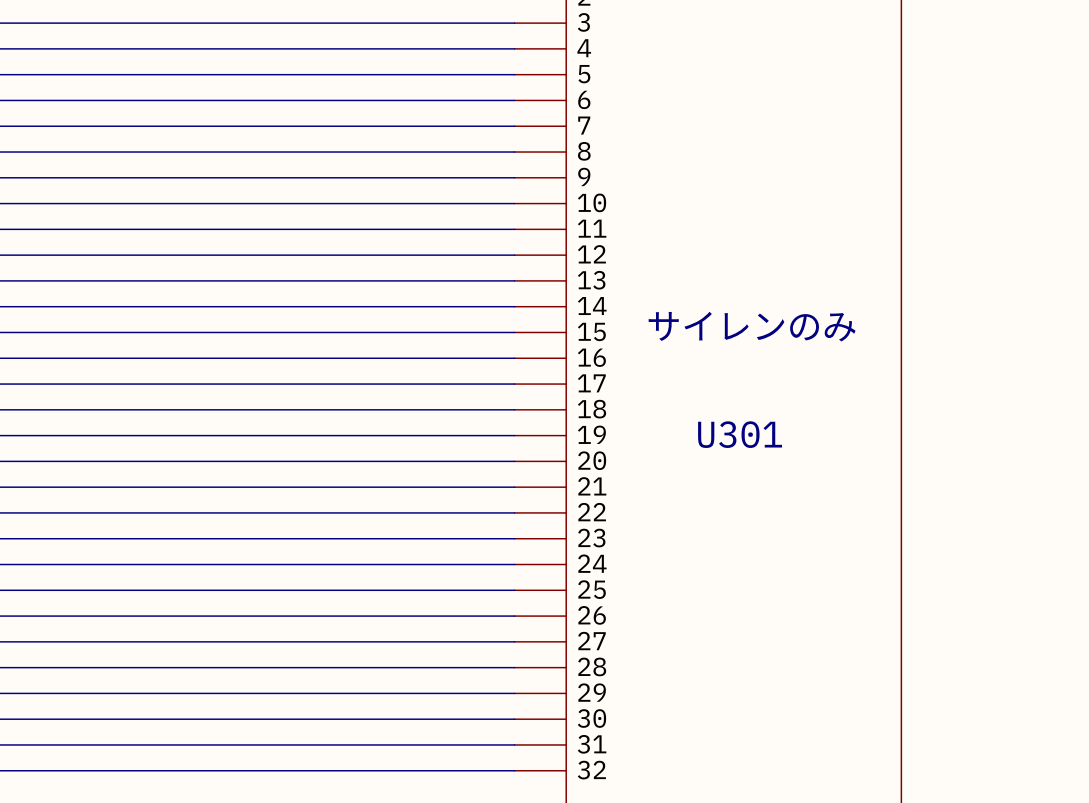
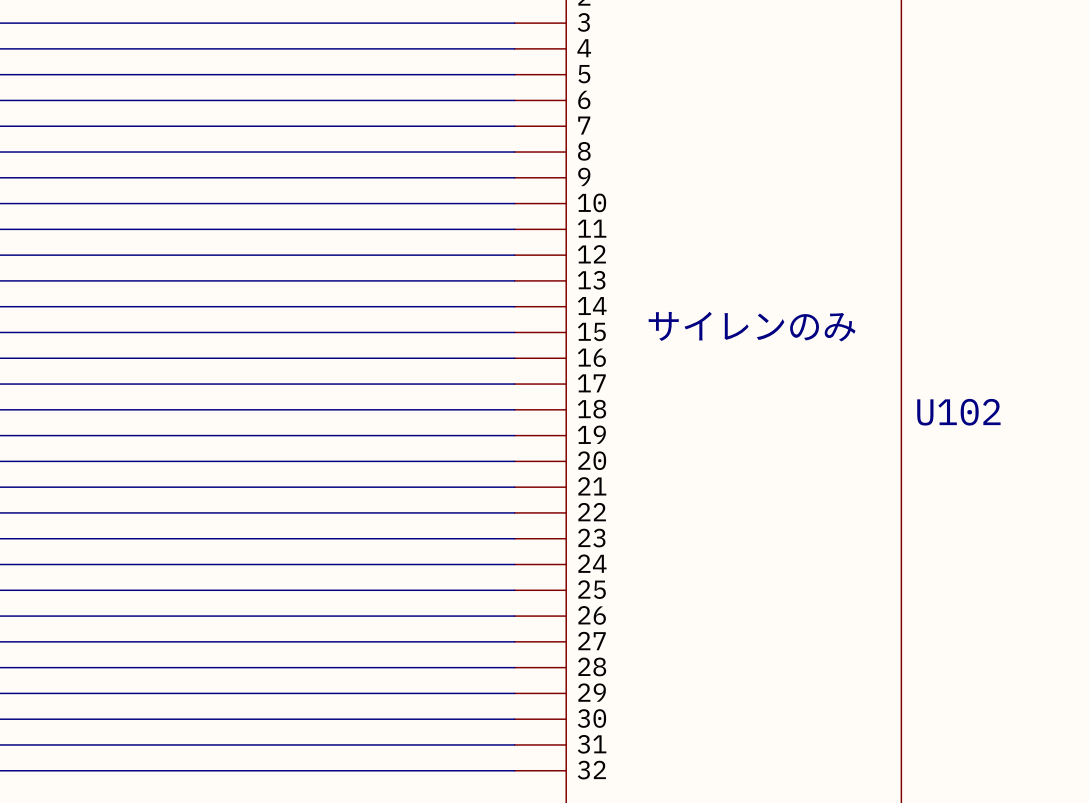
U301 name: U301 (740, 434) -> U102 (958, 412)

